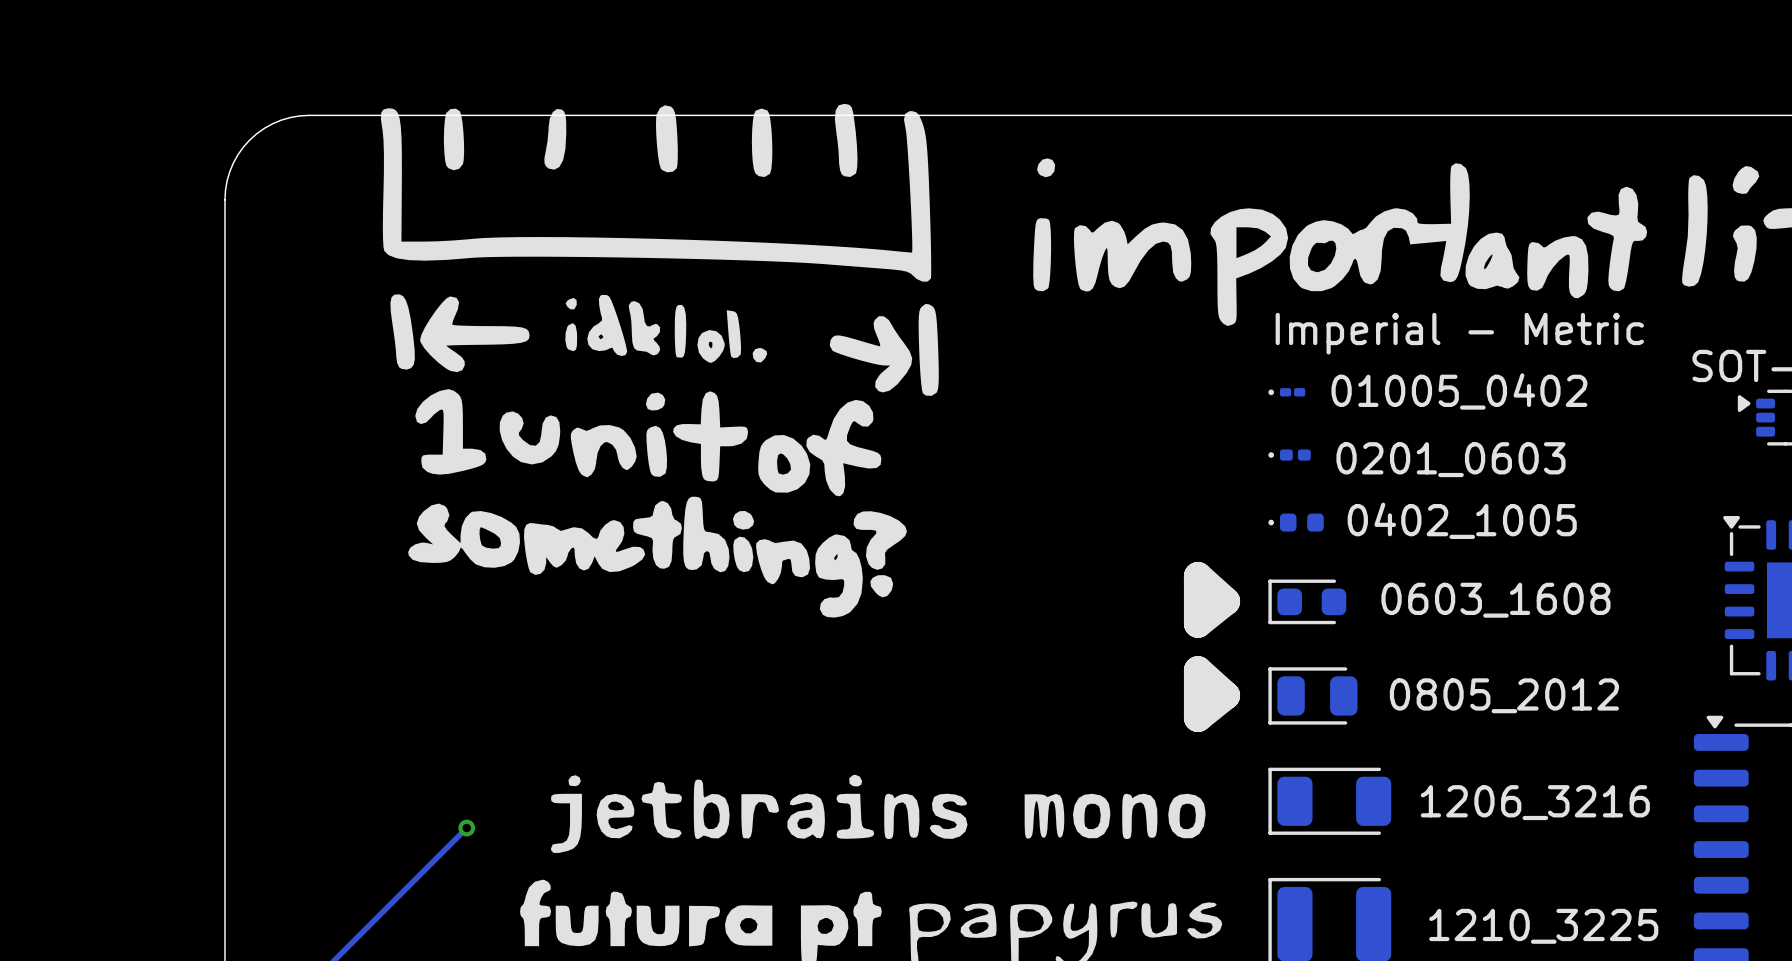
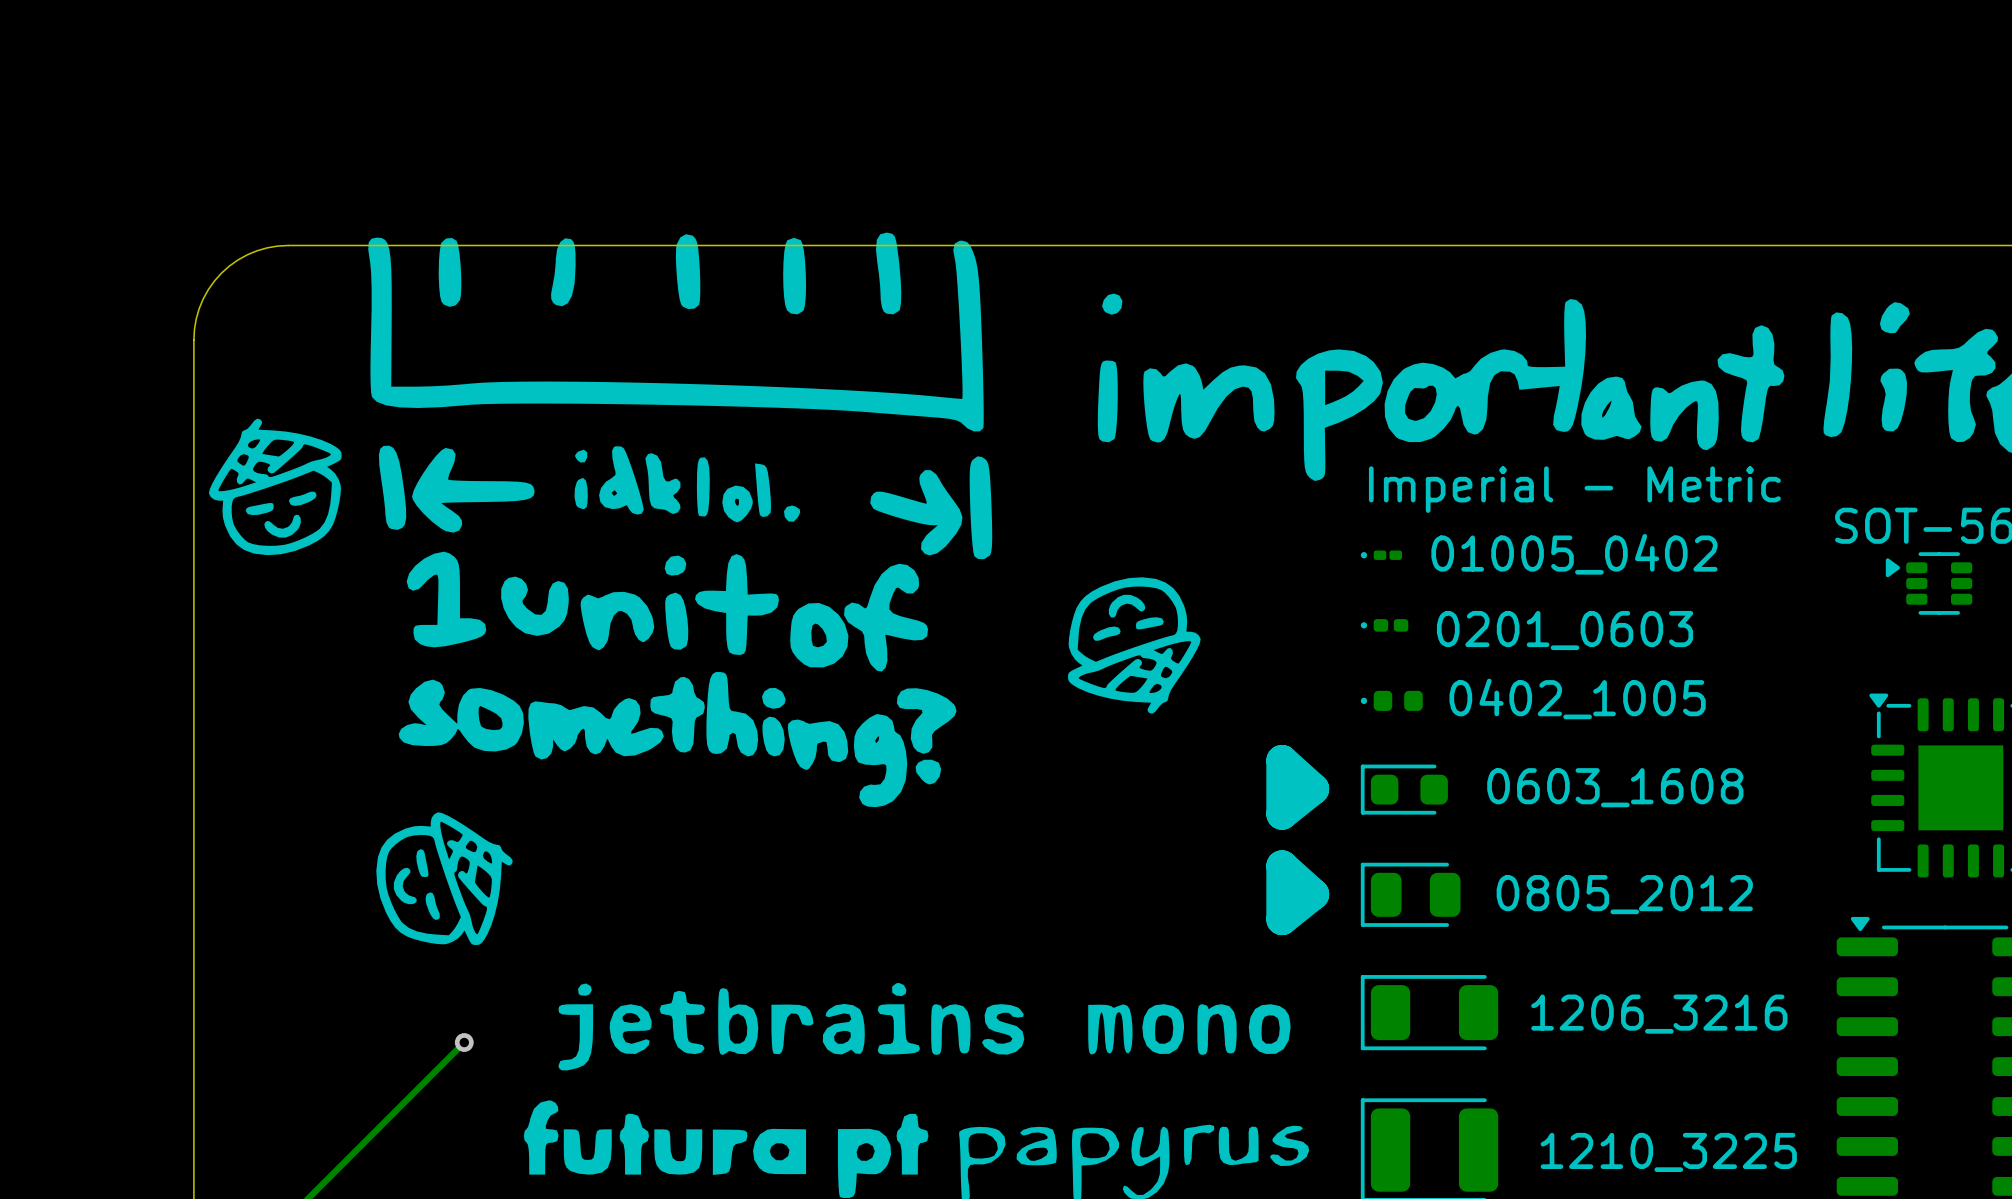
drawing: none -> [208, 418, 342, 556]
drawing: none -> [1067, 577, 1201, 714]
drawing: none -> [376, 812, 513, 946]

